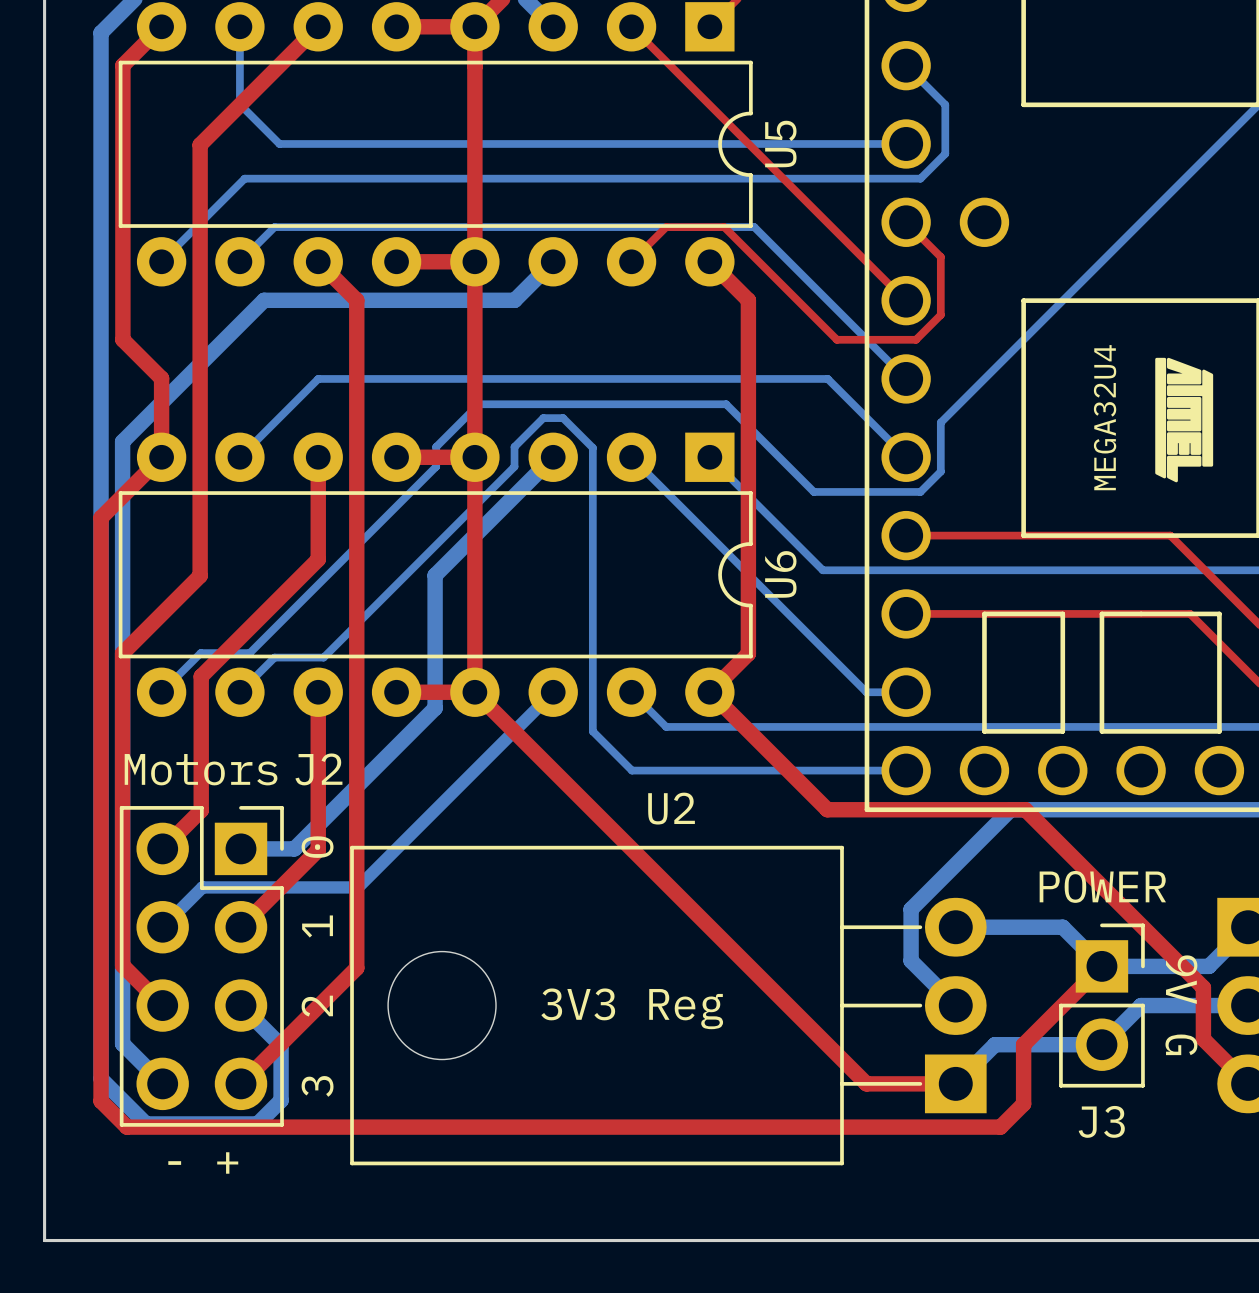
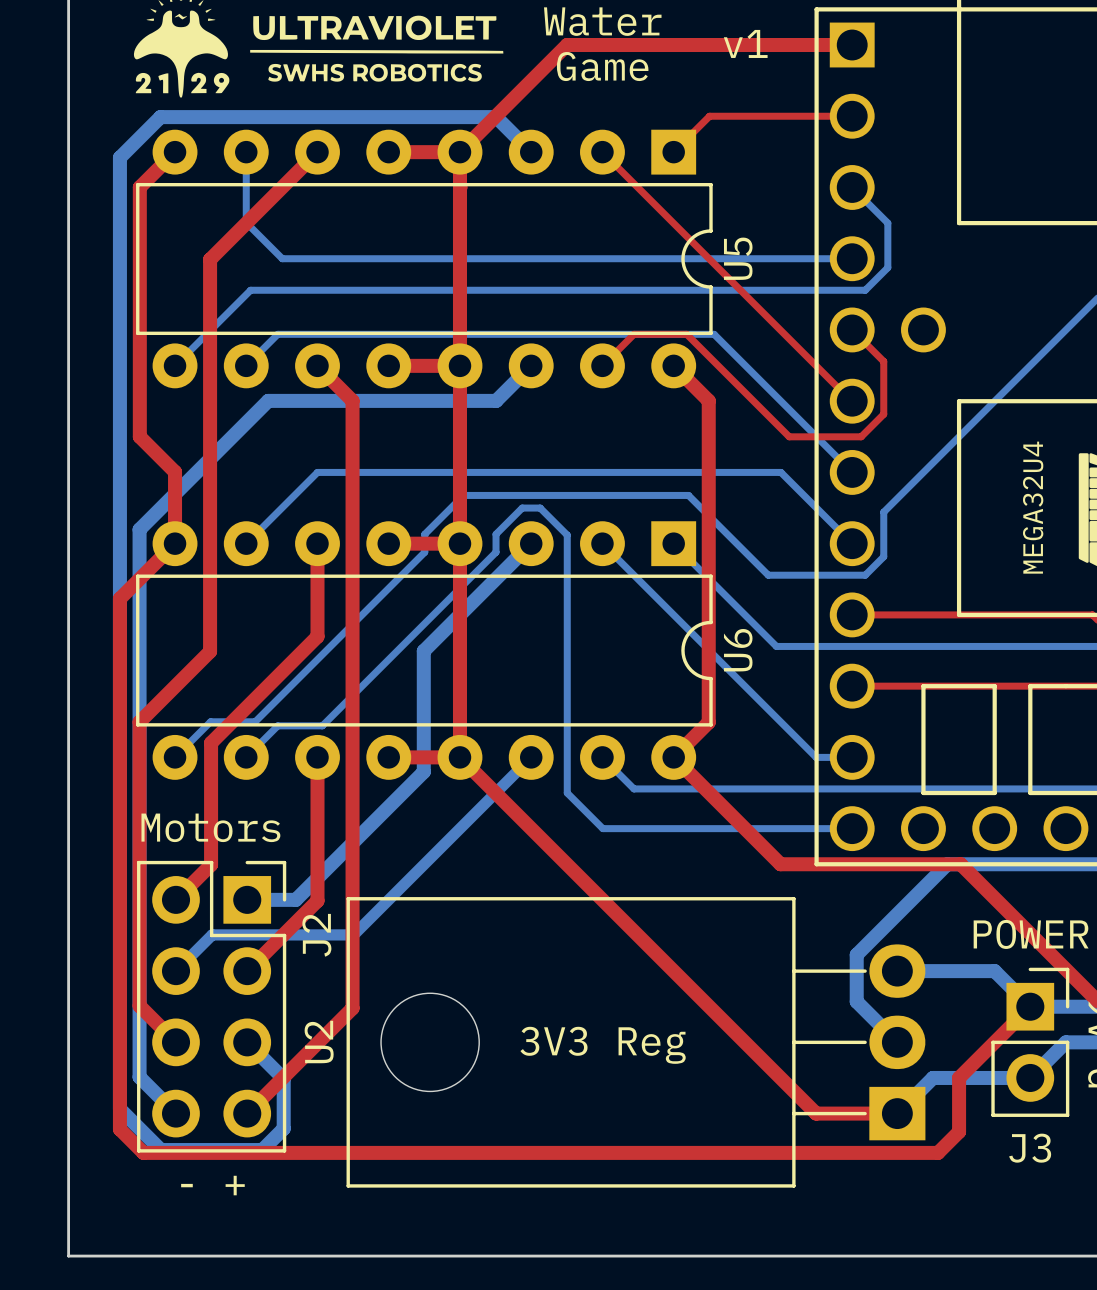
J2 name rotation: 0° (318, 769) -> 90° counterclockwise (316, 935)
J2 name position: J2 (318, 769) -> J2 (316, 935)
U2 name rotation: 0° (671, 808) -> 90° counterclockwise (319, 1042)
U2 name position: U2 (671, 808) -> U2 (319, 1042)
text: 3 2 1 0 (317, 966) -> none

